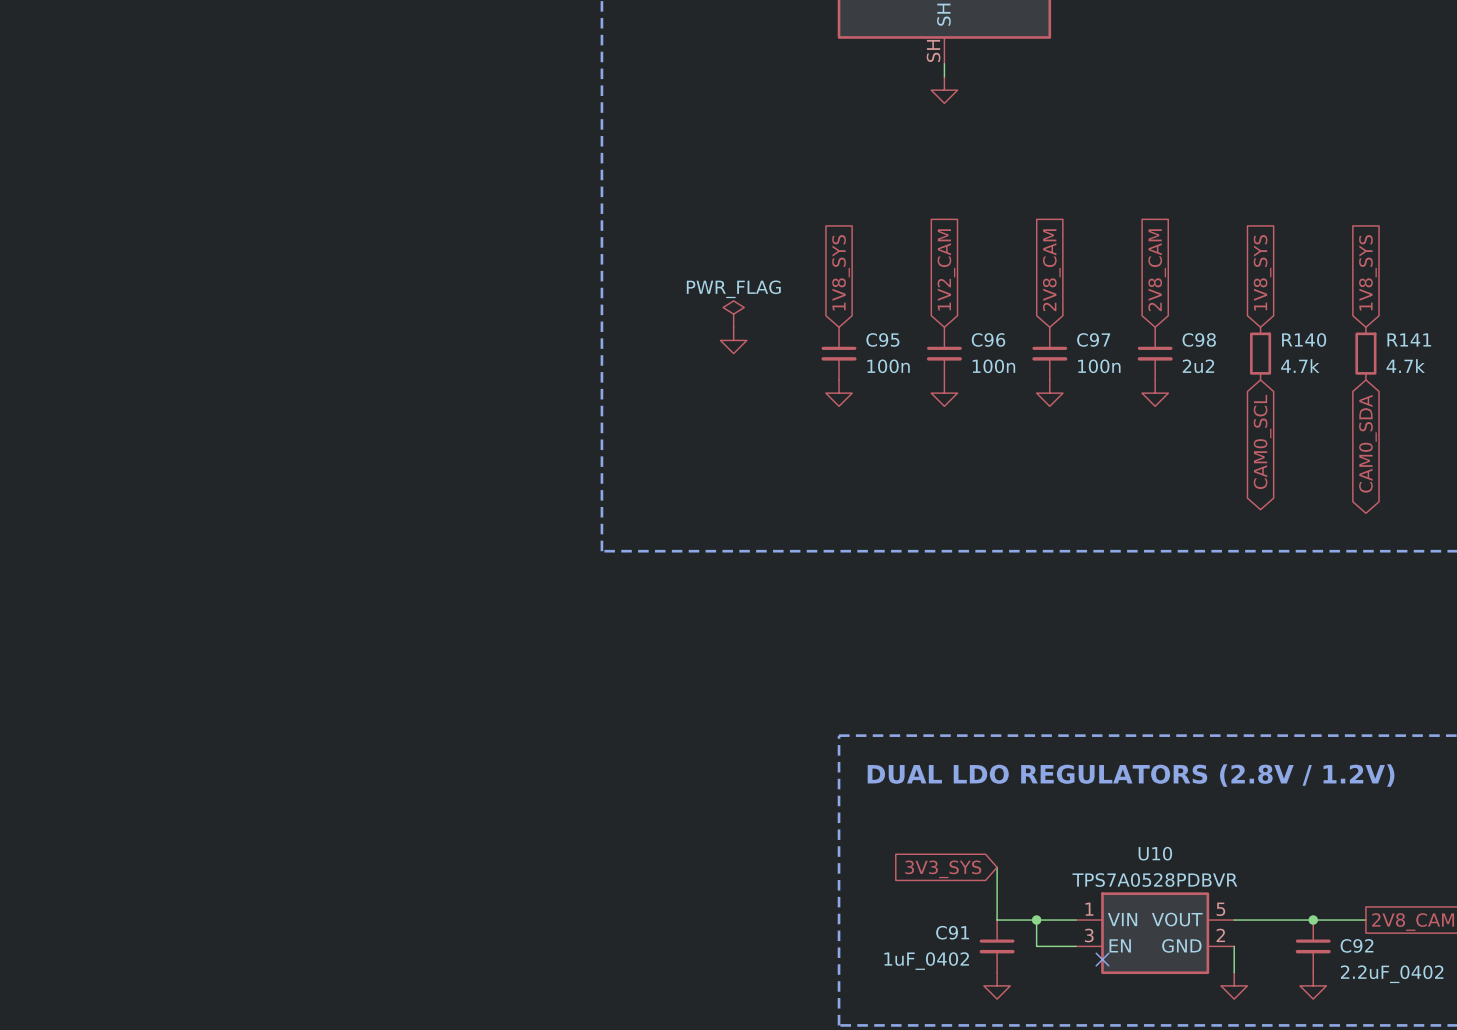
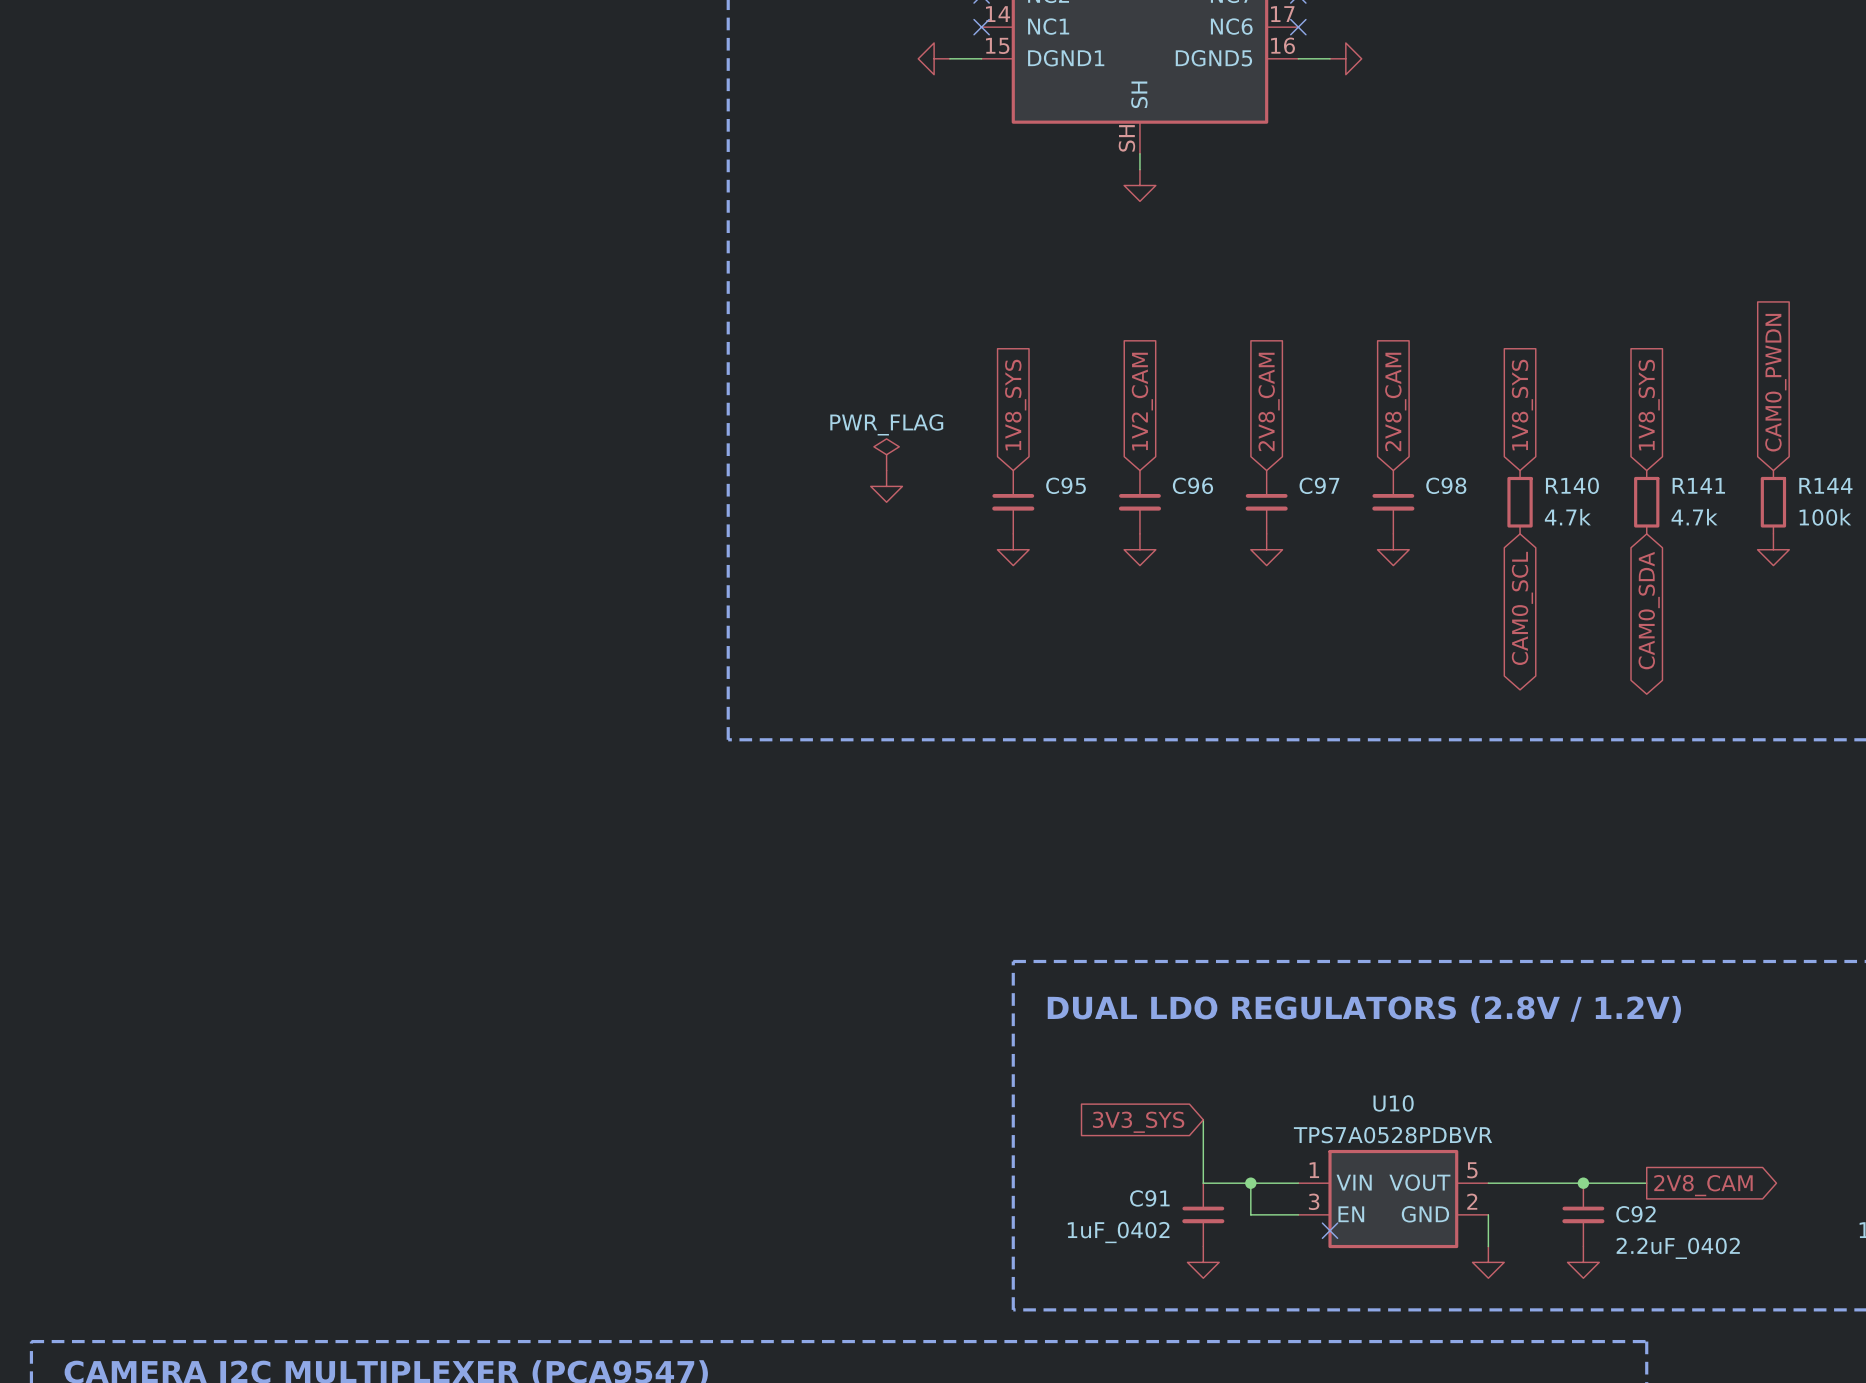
C95 value: 100n (888, 366) -> none
C96 value: 100n (993, 366) -> none
C97 value: 100n (1099, 366) -> none
C98 value: 2u2 (1198, 366) -> none

